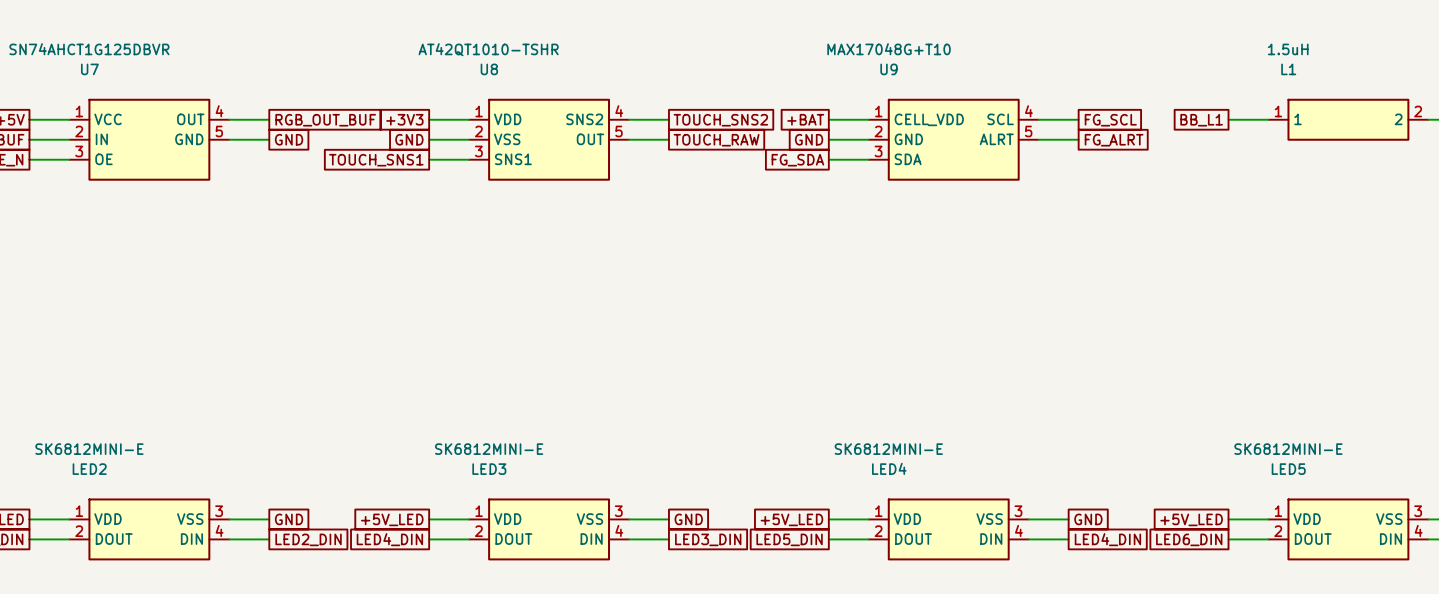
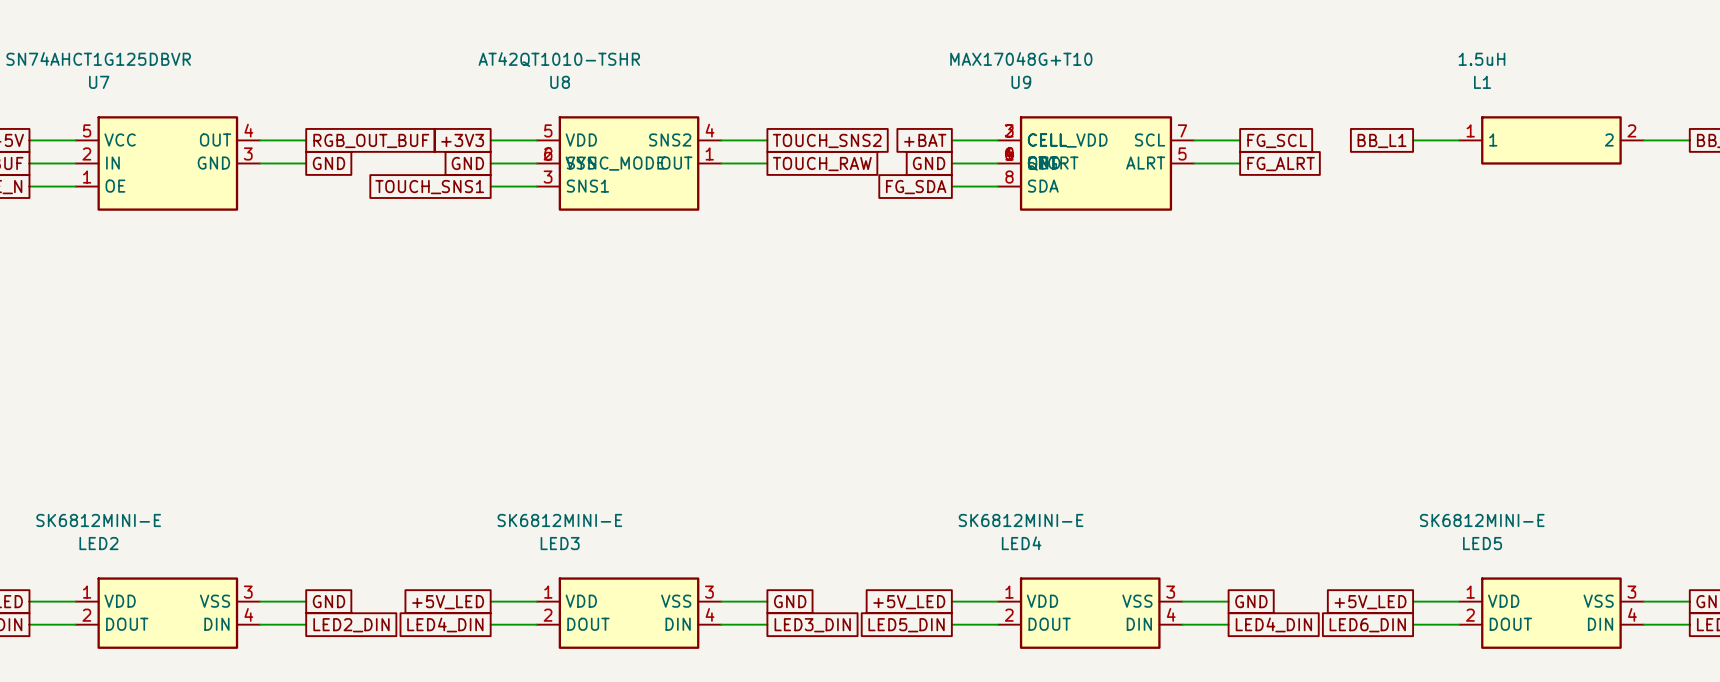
U8 symbol: [469, 98, 630, 181] -> [536, 116, 722, 211]
U9 symbol: [868, 98, 1039, 181] -> [997, 116, 1195, 211]
U7 pin number: 1 (79, 111) -> 5 (87, 130)
U7 pin number: 5 (219, 131) -> 3 (248, 153)
U7 pin number: 3 (79, 151) -> 1 (87, 177)

